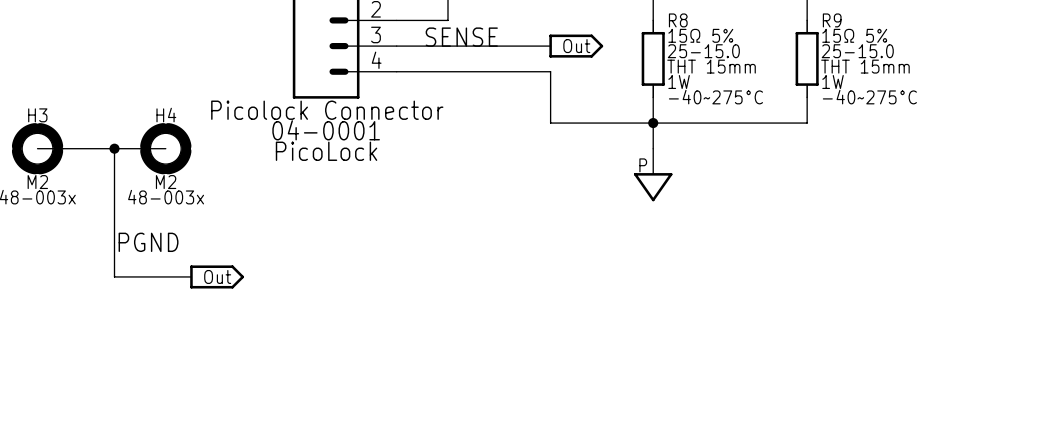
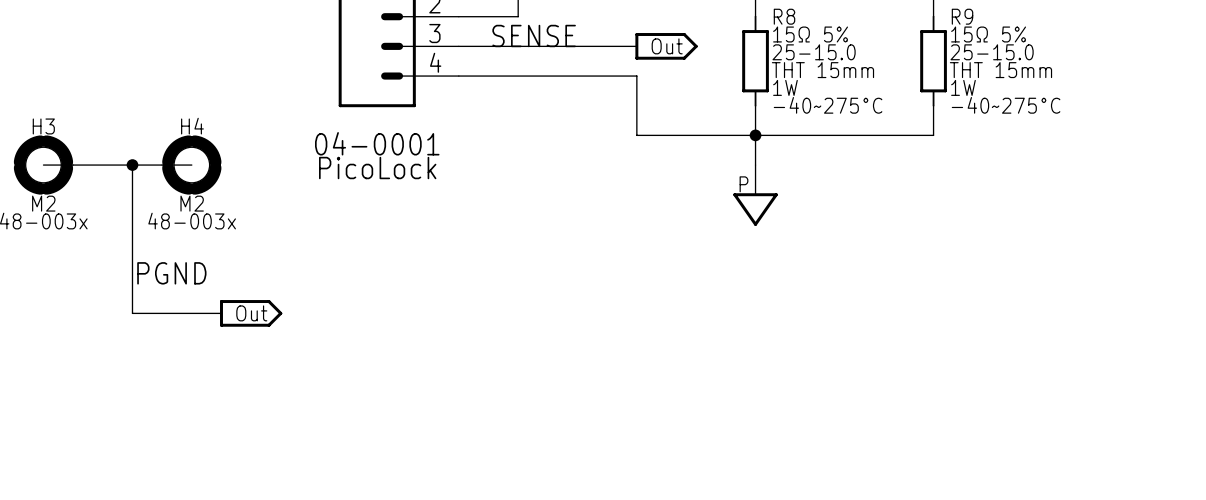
part value: Picolock Connector (327, 110) -> none

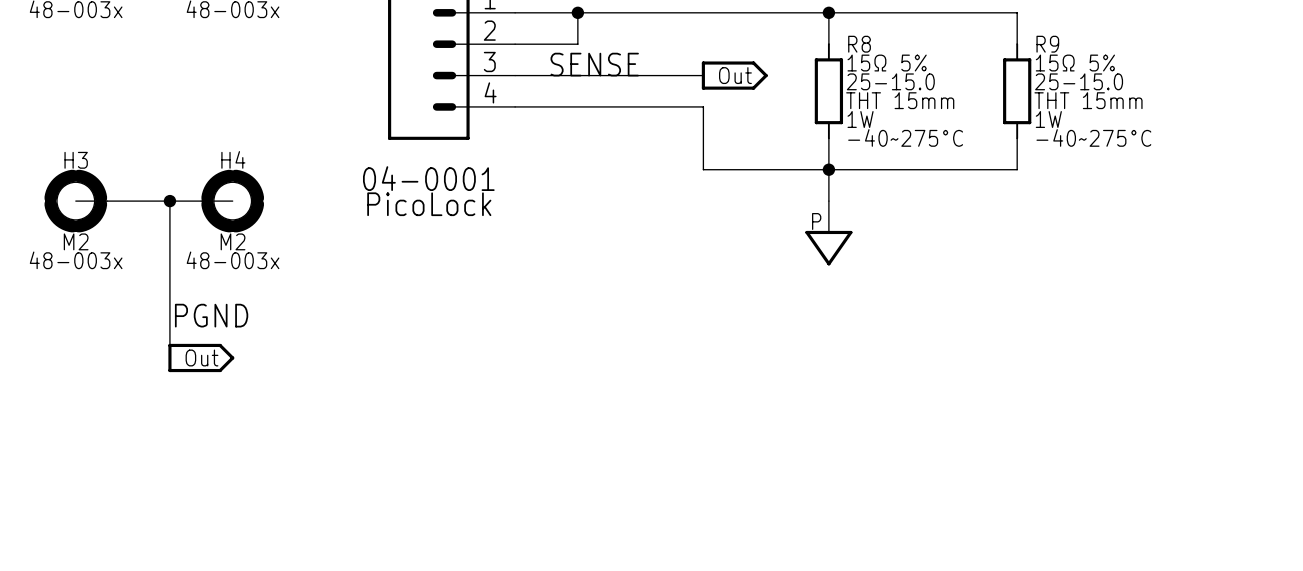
wire: (132, 313) (221, 313) -> none
part position: (251, 313) -> (201, 357)

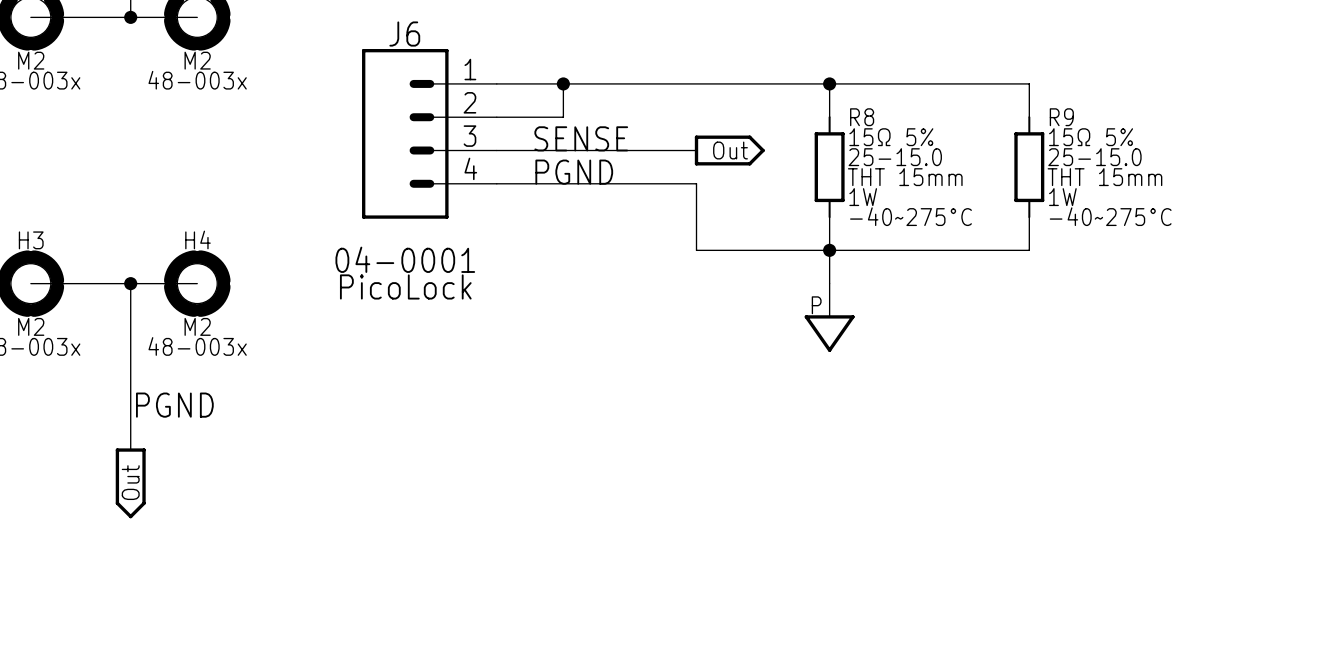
label: none -> PGND (574, 172)
part: (201, 357) -> none
part: none -> (130, 483)

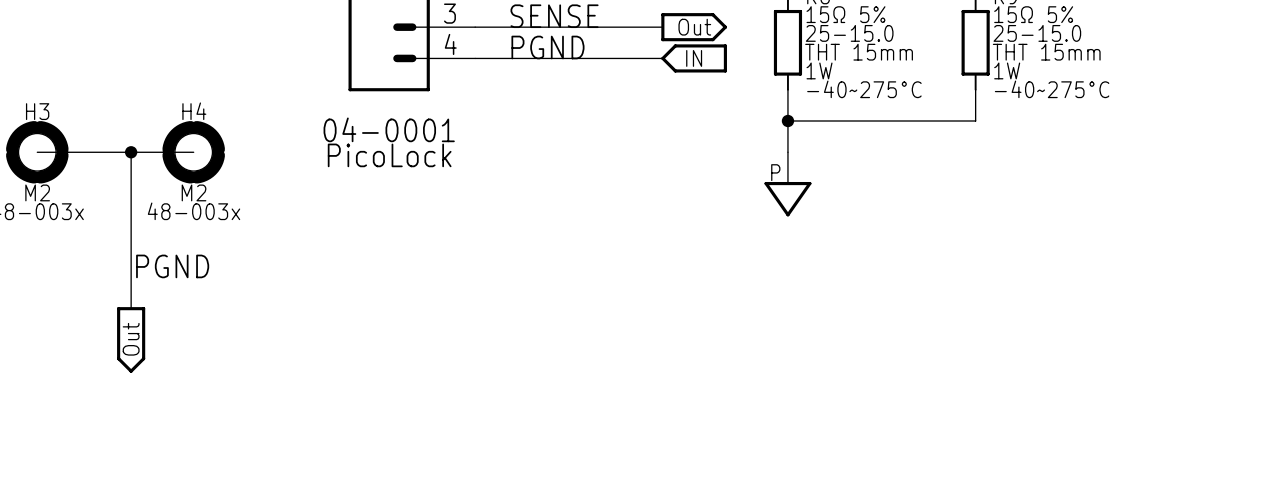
wire: (696, 183) (696, 250) (829, 250) -> none
part: none -> (694, 58)

